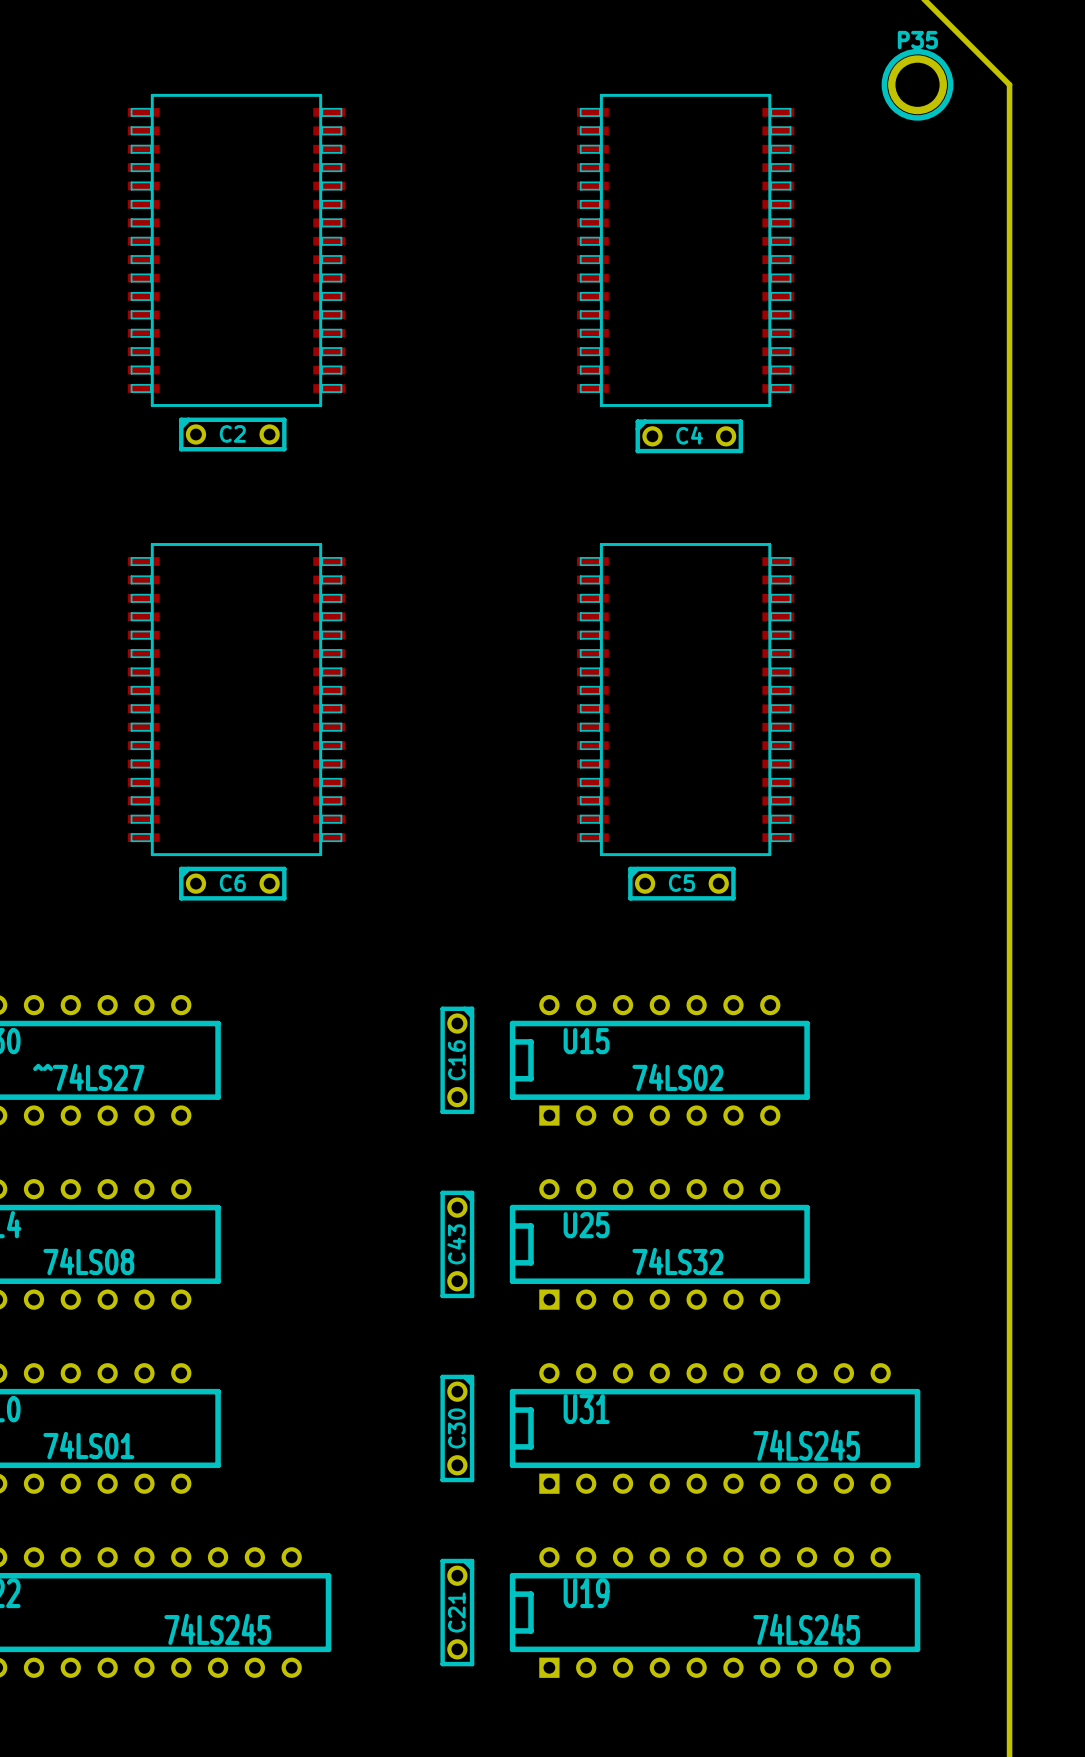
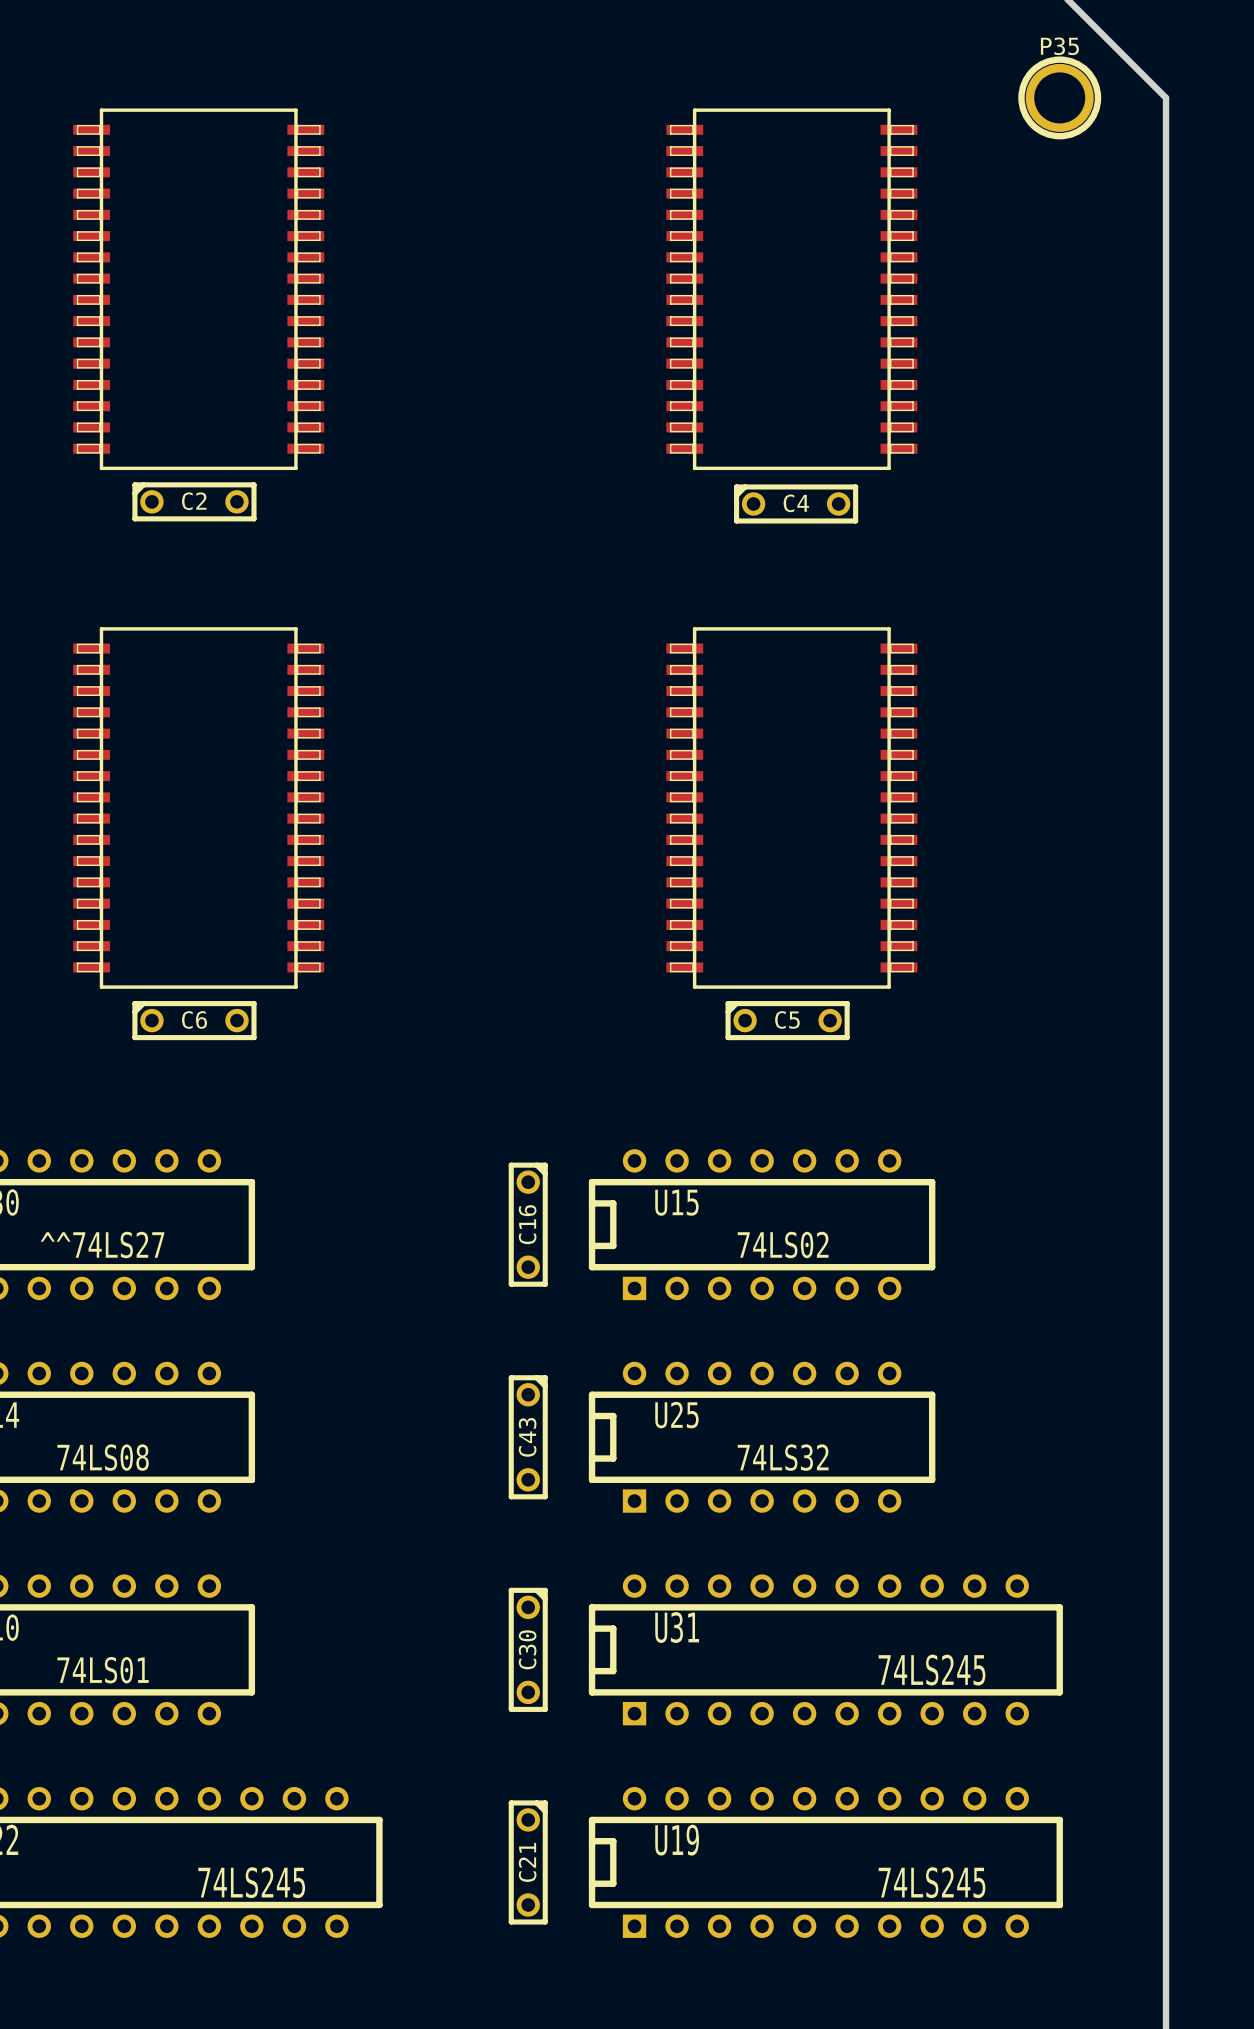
part position: (236, 250) -> (198, 289)
C2 position: (232, 434) -> (194, 501)
part position: (236, 699) -> (198, 807)
C6 position: (232, 883) -> (194, 1020)

